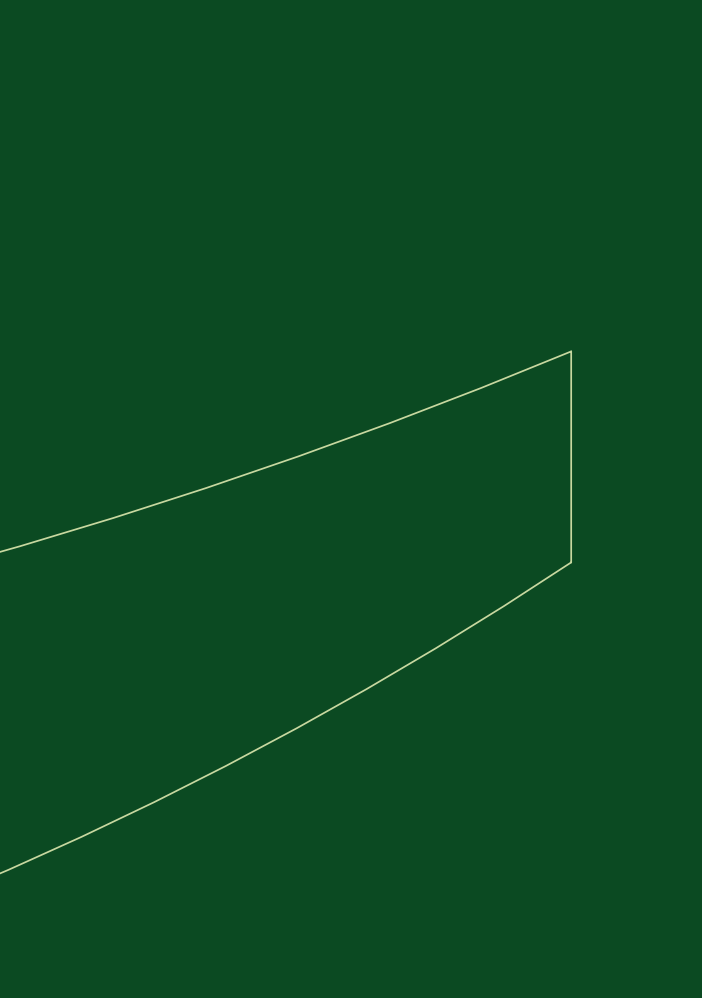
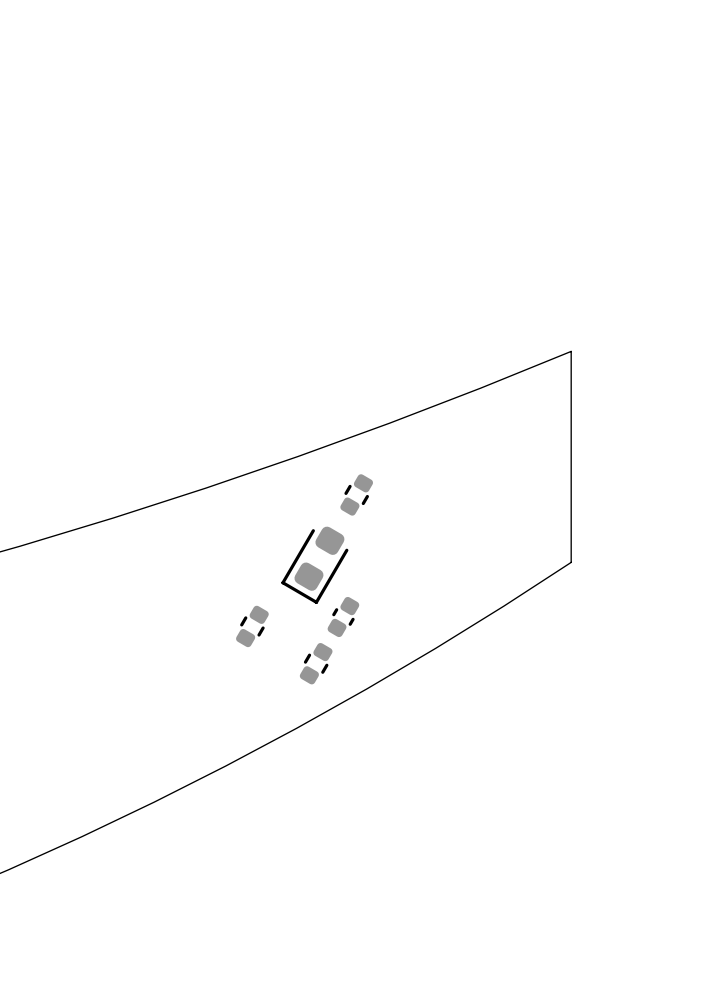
part: none -> (356, 494)
part: none -> (314, 565)
part: none -> (343, 617)
part: none -> (252, 626)
part: none -> (316, 663)

